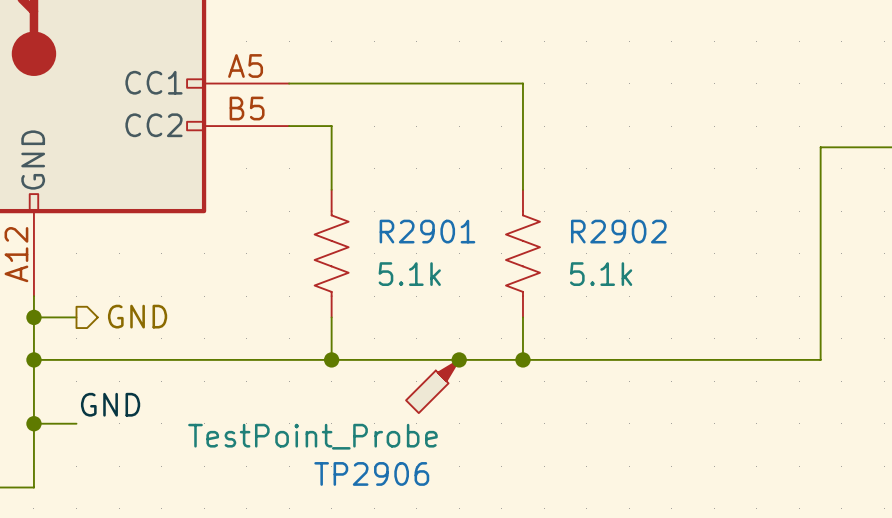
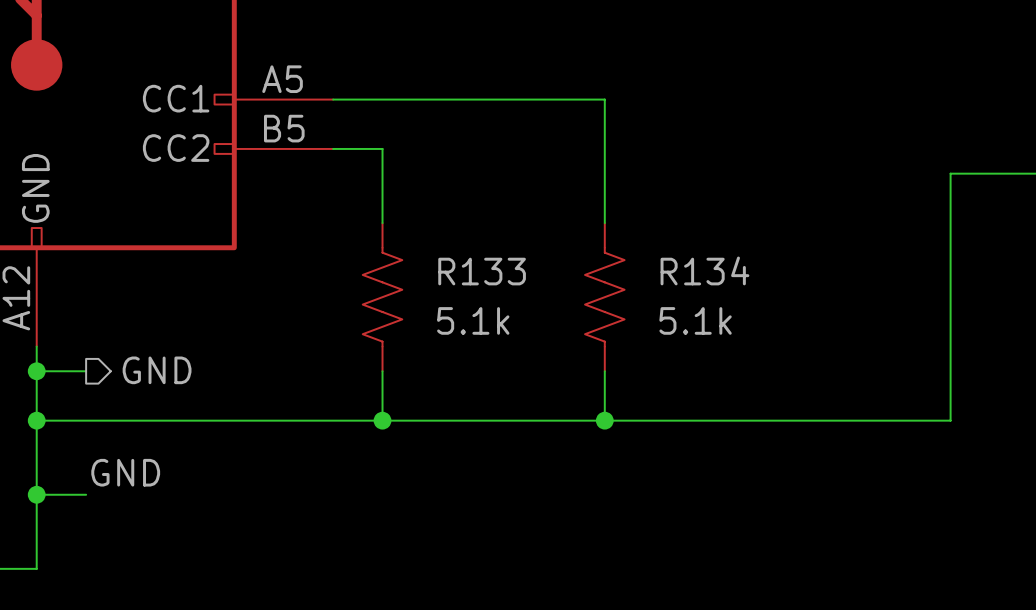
R2901 name: R2901 (427, 231) -> R133 (482, 271)
R2902 name: R2902 (618, 231) -> R134 (704, 270)
junction: (459, 359) -> none
TP2906: TestPoint_Probe (432, 386) -> none

